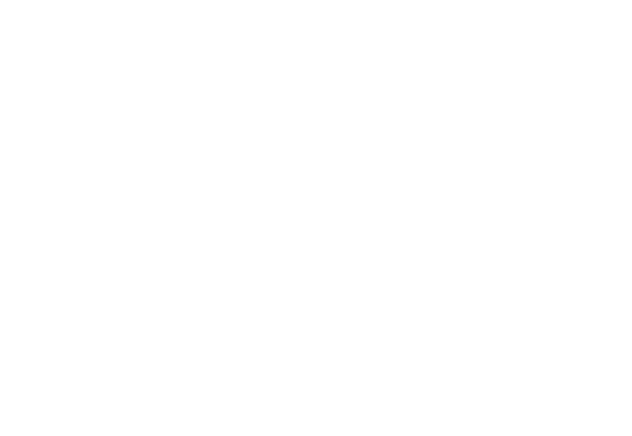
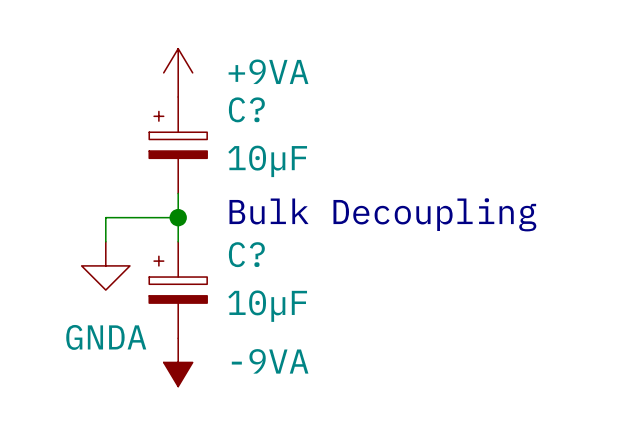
power symbol: none -> +9VA (178, 72)
C?: none -> 10µF (178, 145)
wire: none -> (178, 193) (178, 241)
text: none -> Bulk Decoupling (382, 214)
wire: none -> (178, 217) (105, 217) (105, 241)
junction: none -> (178, 217)
power symbol: none -> GNDA (105, 265)
C?: none -> 10µF (178, 290)
power symbol: none -> -9VA (178, 362)

